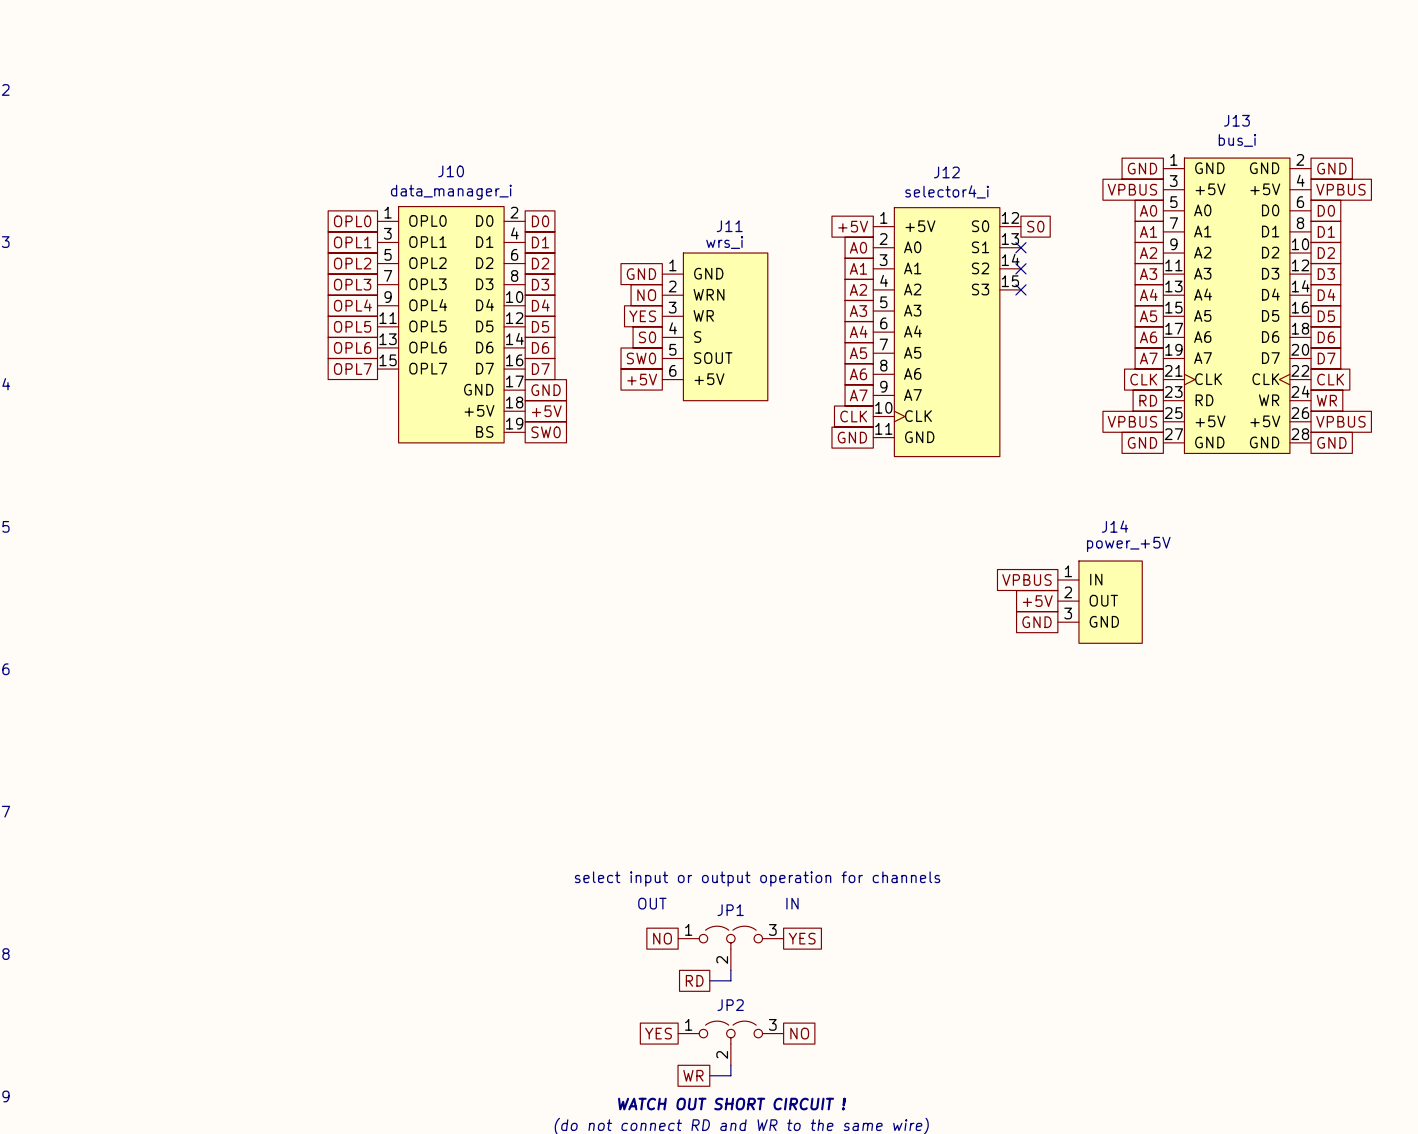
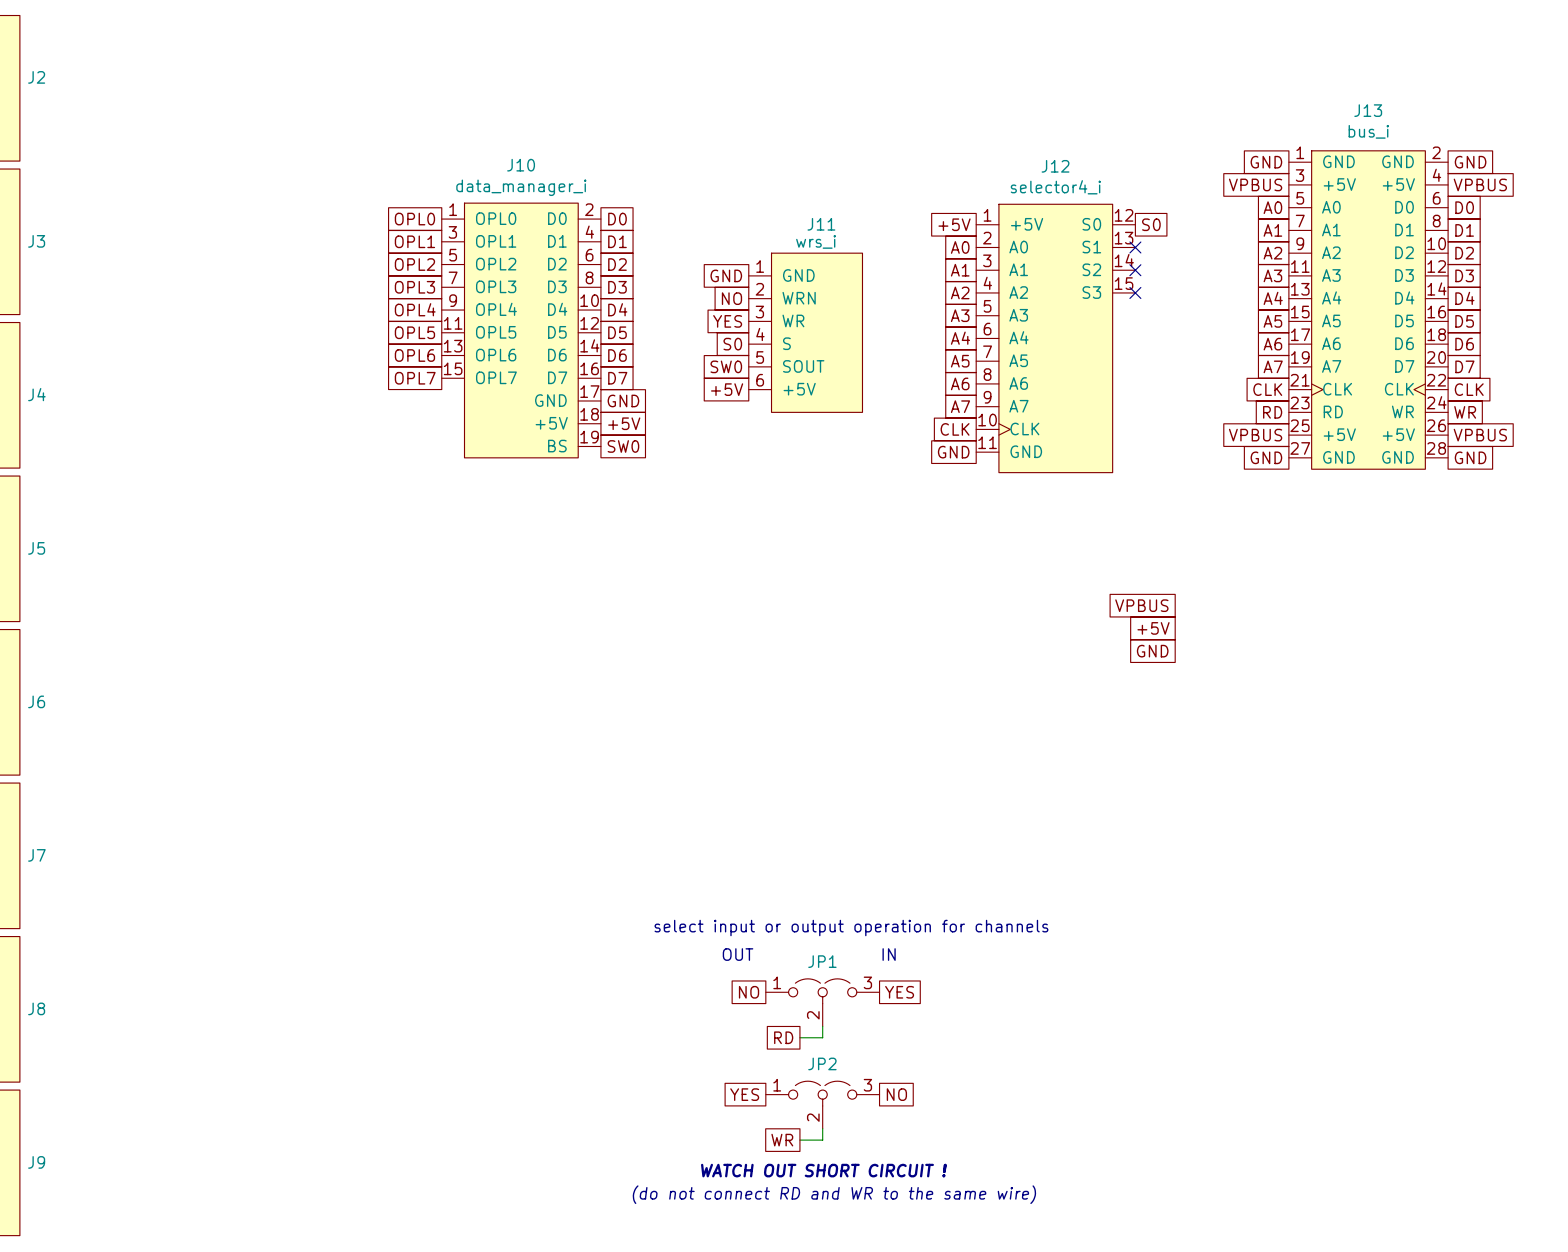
J14: power_+5V (1100, 602) -> none

